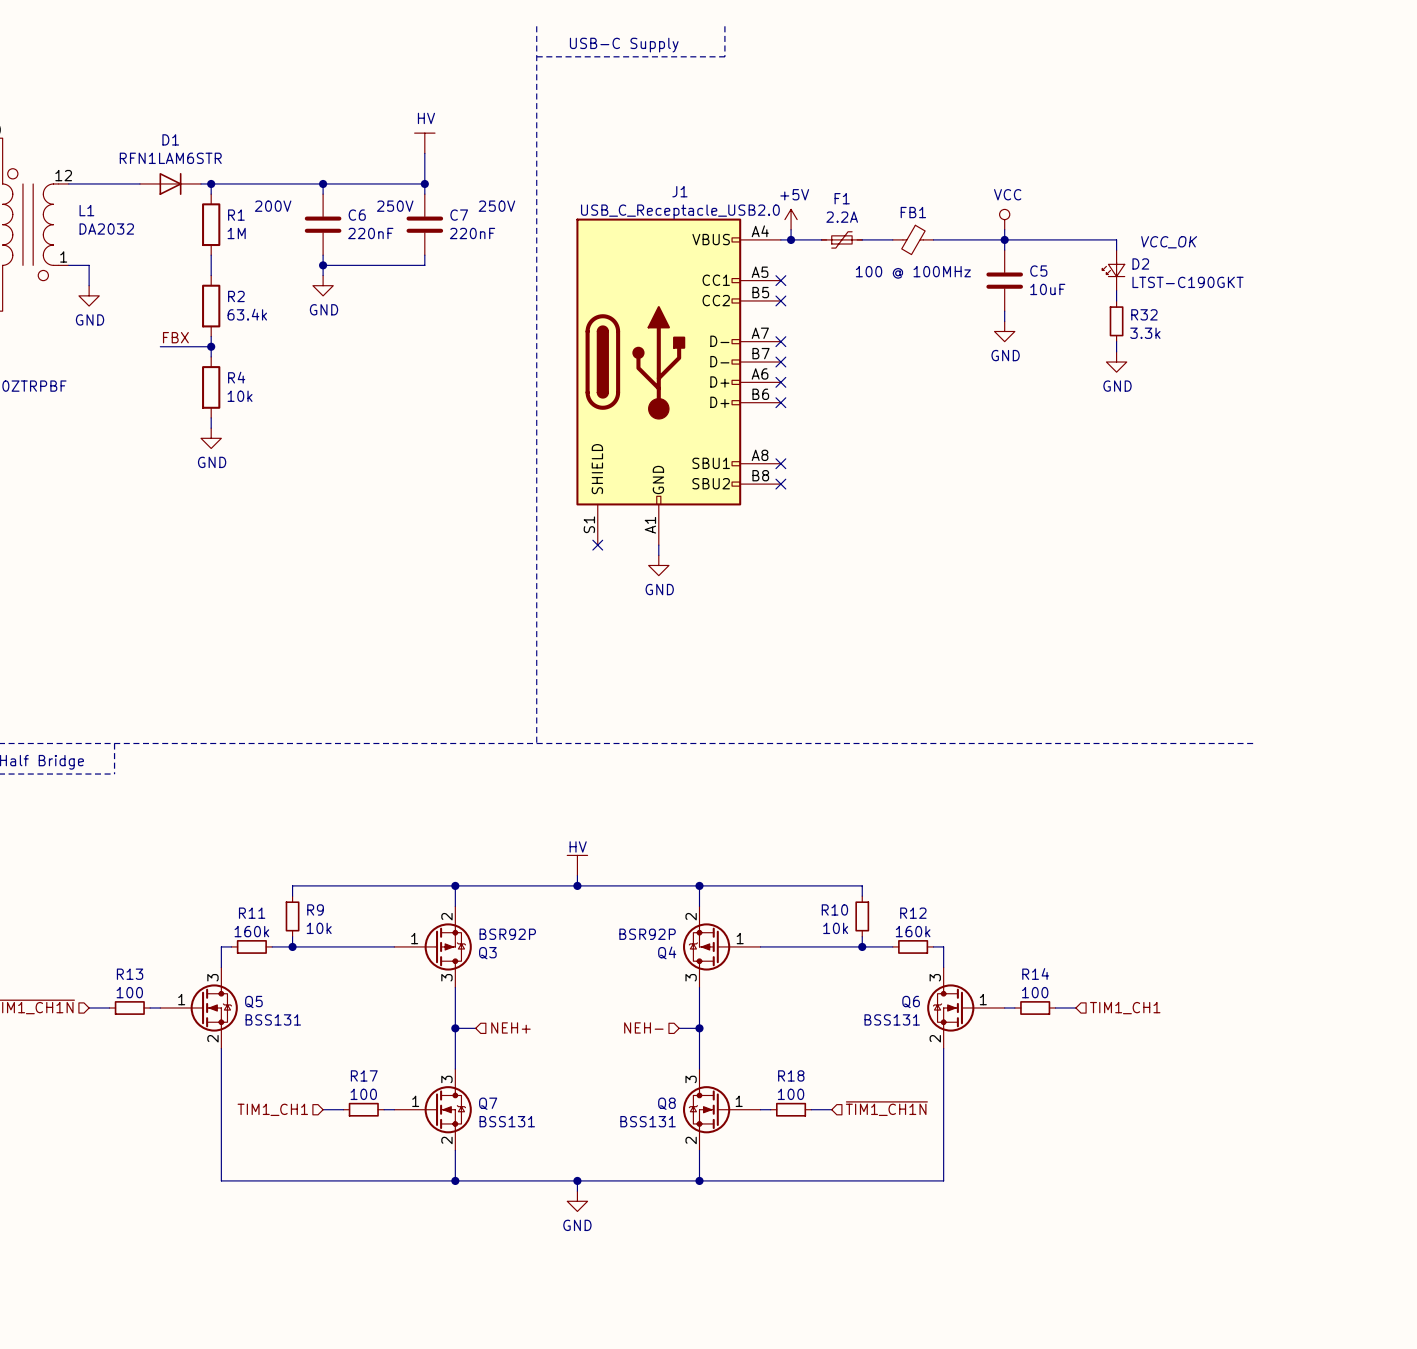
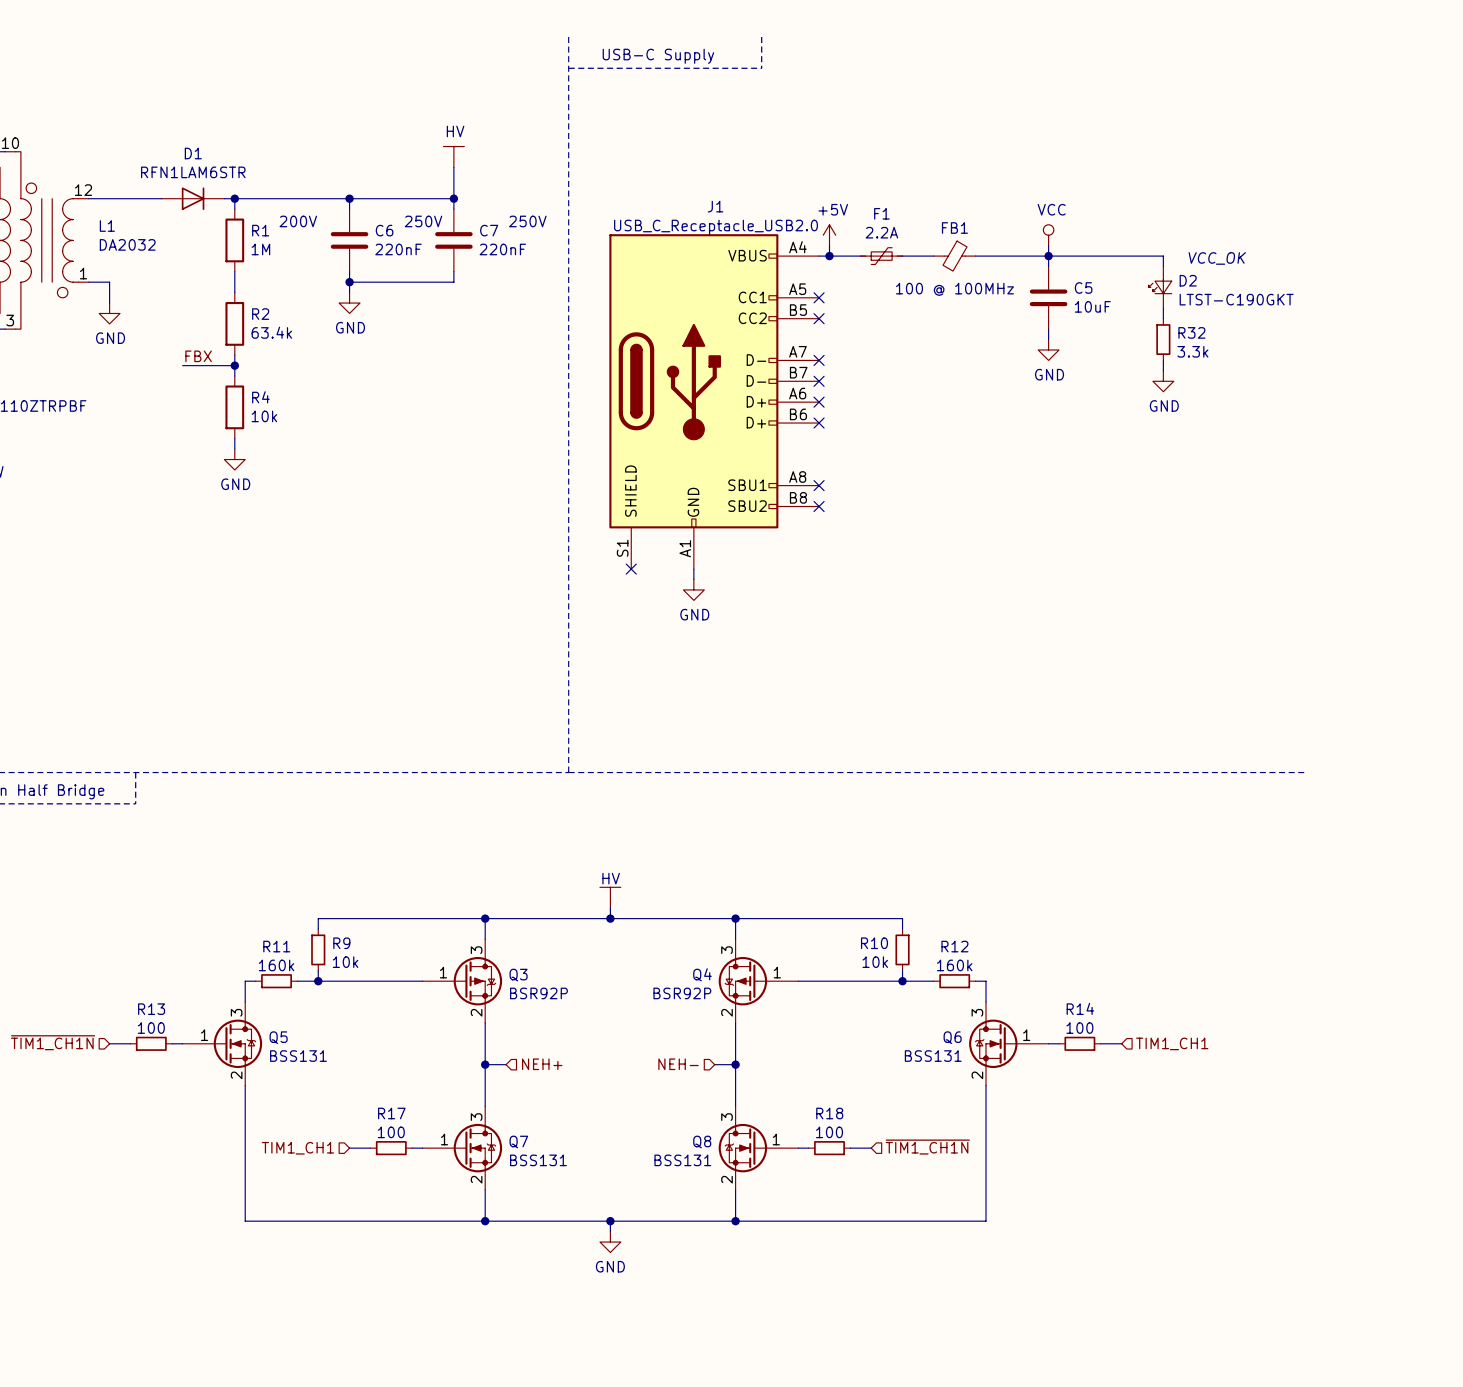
Q3 flip: as is (448, 946) -> up-down (477, 981)
Q4 flip: as is (706, 946) -> up-down (742, 981)

